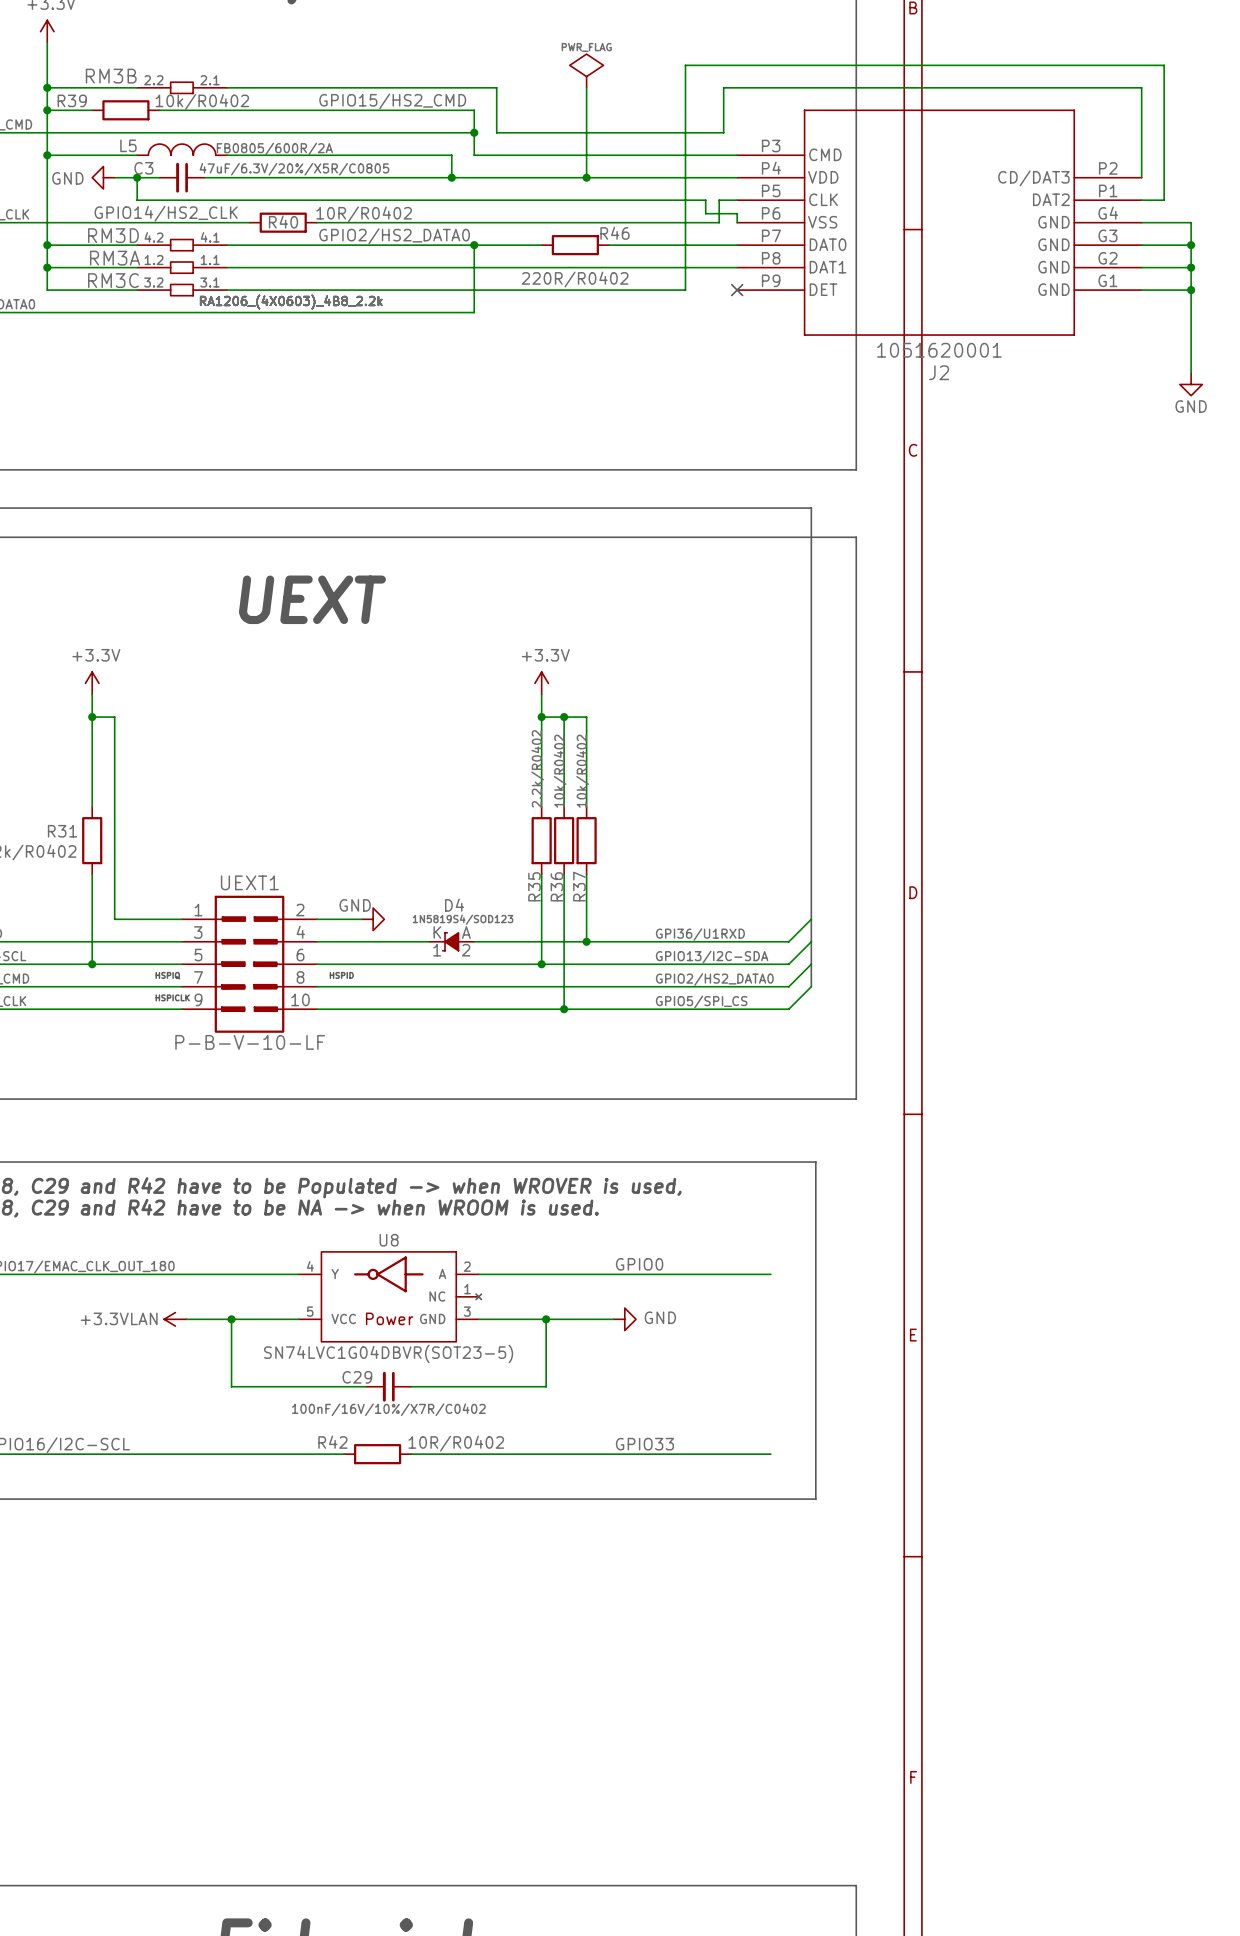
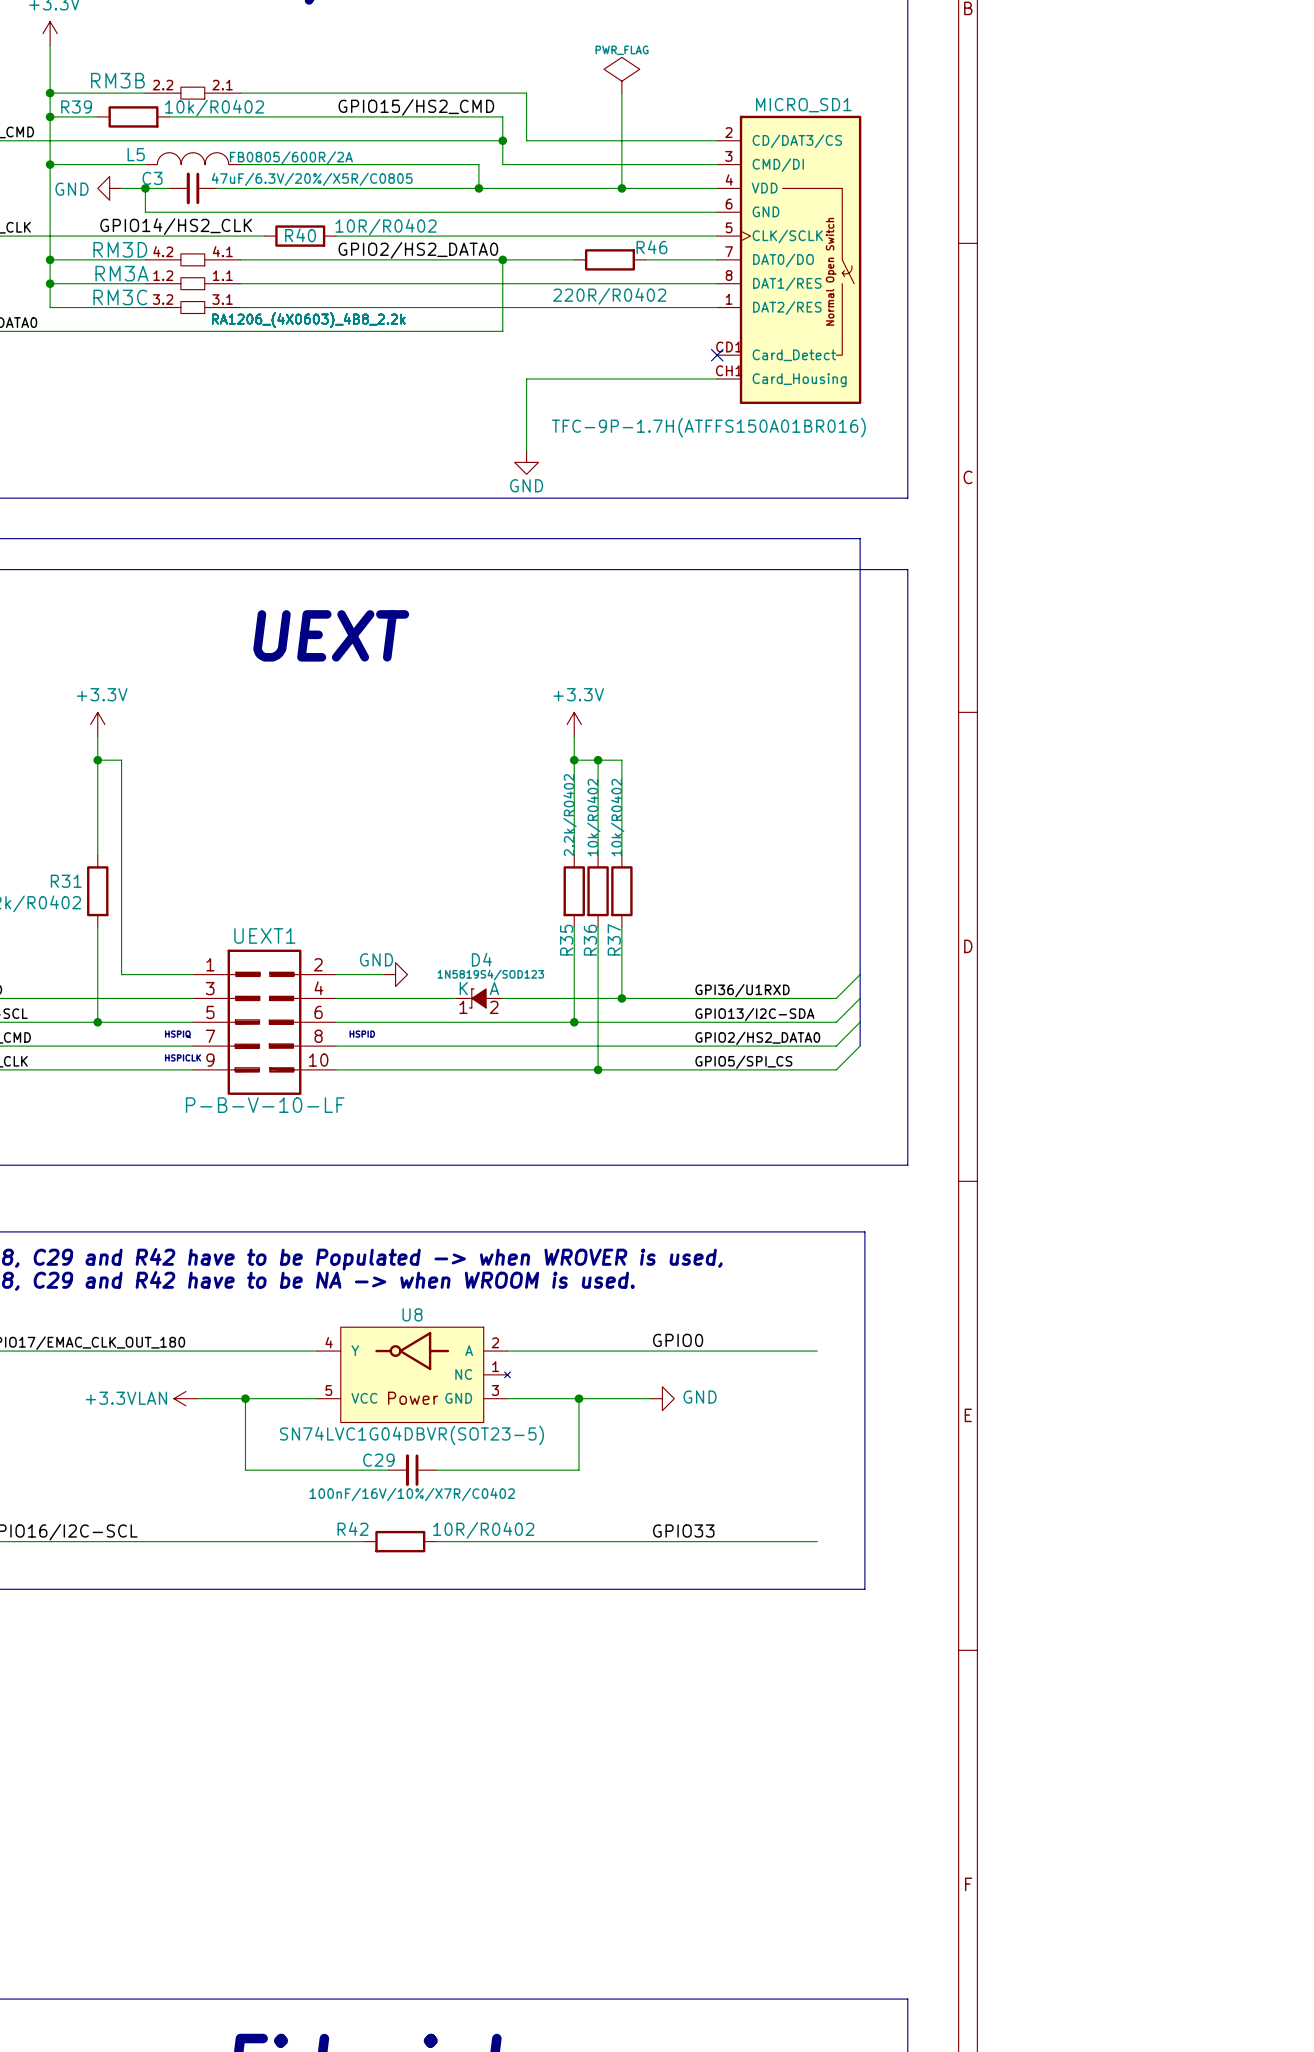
wire: (676, 132) (723, 132) (723, 87) (1141, 87) (1141, 177) -> none
wire: (1141, 200) (1164, 200) (1164, 65) (685, 65) (685, 290) (676, 290) -> none
J2: 1051620001 (939, 222) -> none
wire: (1141, 222) (1191, 222) (1191, 373) -> none
MICRO_SD1: none -> TFC-9P-1.7H(ATFFS150A01BR016) (789, 259)
wire: (1141, 245) (1191, 245) -> none
junction: (1191, 245) -> none
wire: (1141, 267) (1191, 267) -> none
junction: (1191, 267) -> none
no-connect mark: (737, 290) -> none
wire: (1141, 290) (1191, 290) -> none
junction: (1191, 290) -> none
no-connect mark: none -> (717, 355)
wire: none -> (717, 379) (526, 379) (526, 450)
power symbol: GND (1191, 384) -> none
power symbol: none -> GND (526, 462)

